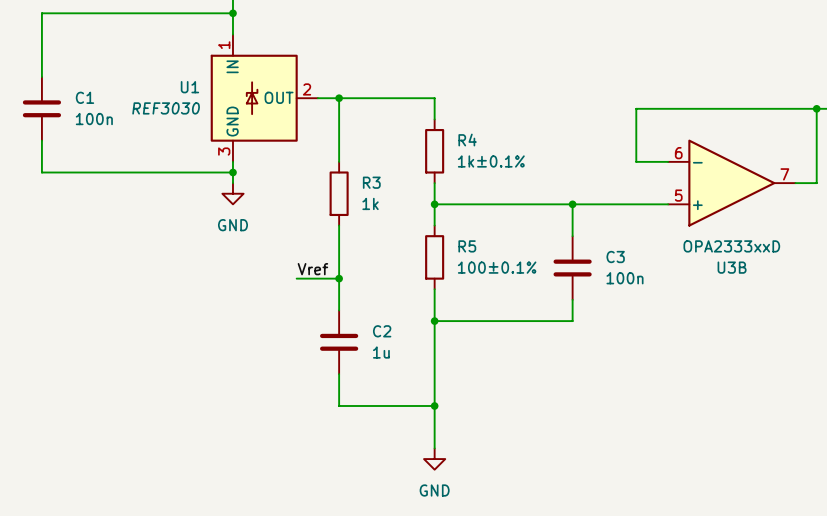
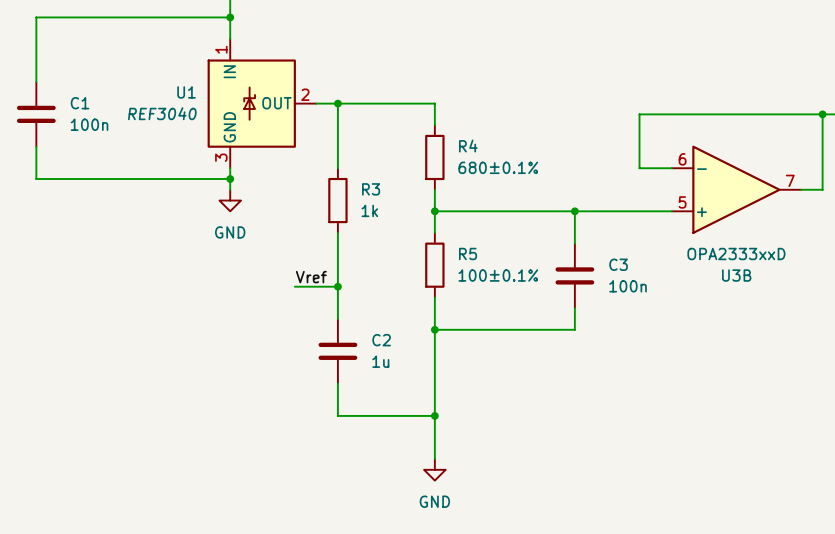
U1 value: REF3030 (166, 108) -> REF3040 (162, 113)
R4 value: 1k±0.1% (491, 161) -> 680±0.1% (498, 167)

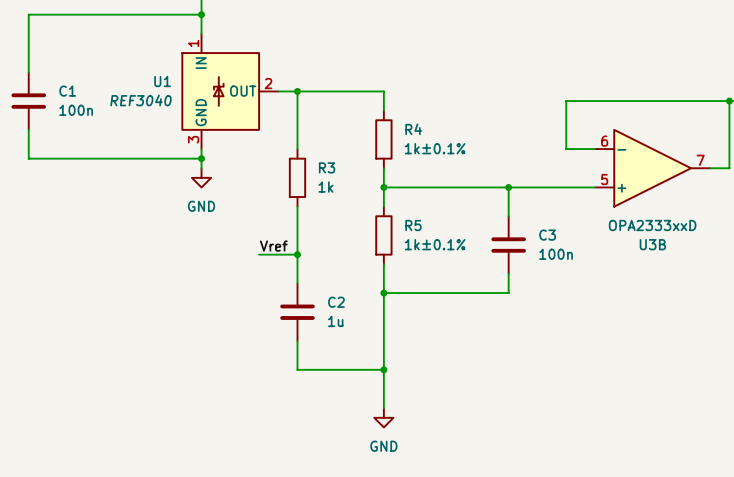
R4 value: 680±0.1% (498, 167) -> 1k±0.1% (435, 148)
R5 value: 100±0.1% (498, 275) -> 1k±0.1% (435, 244)

